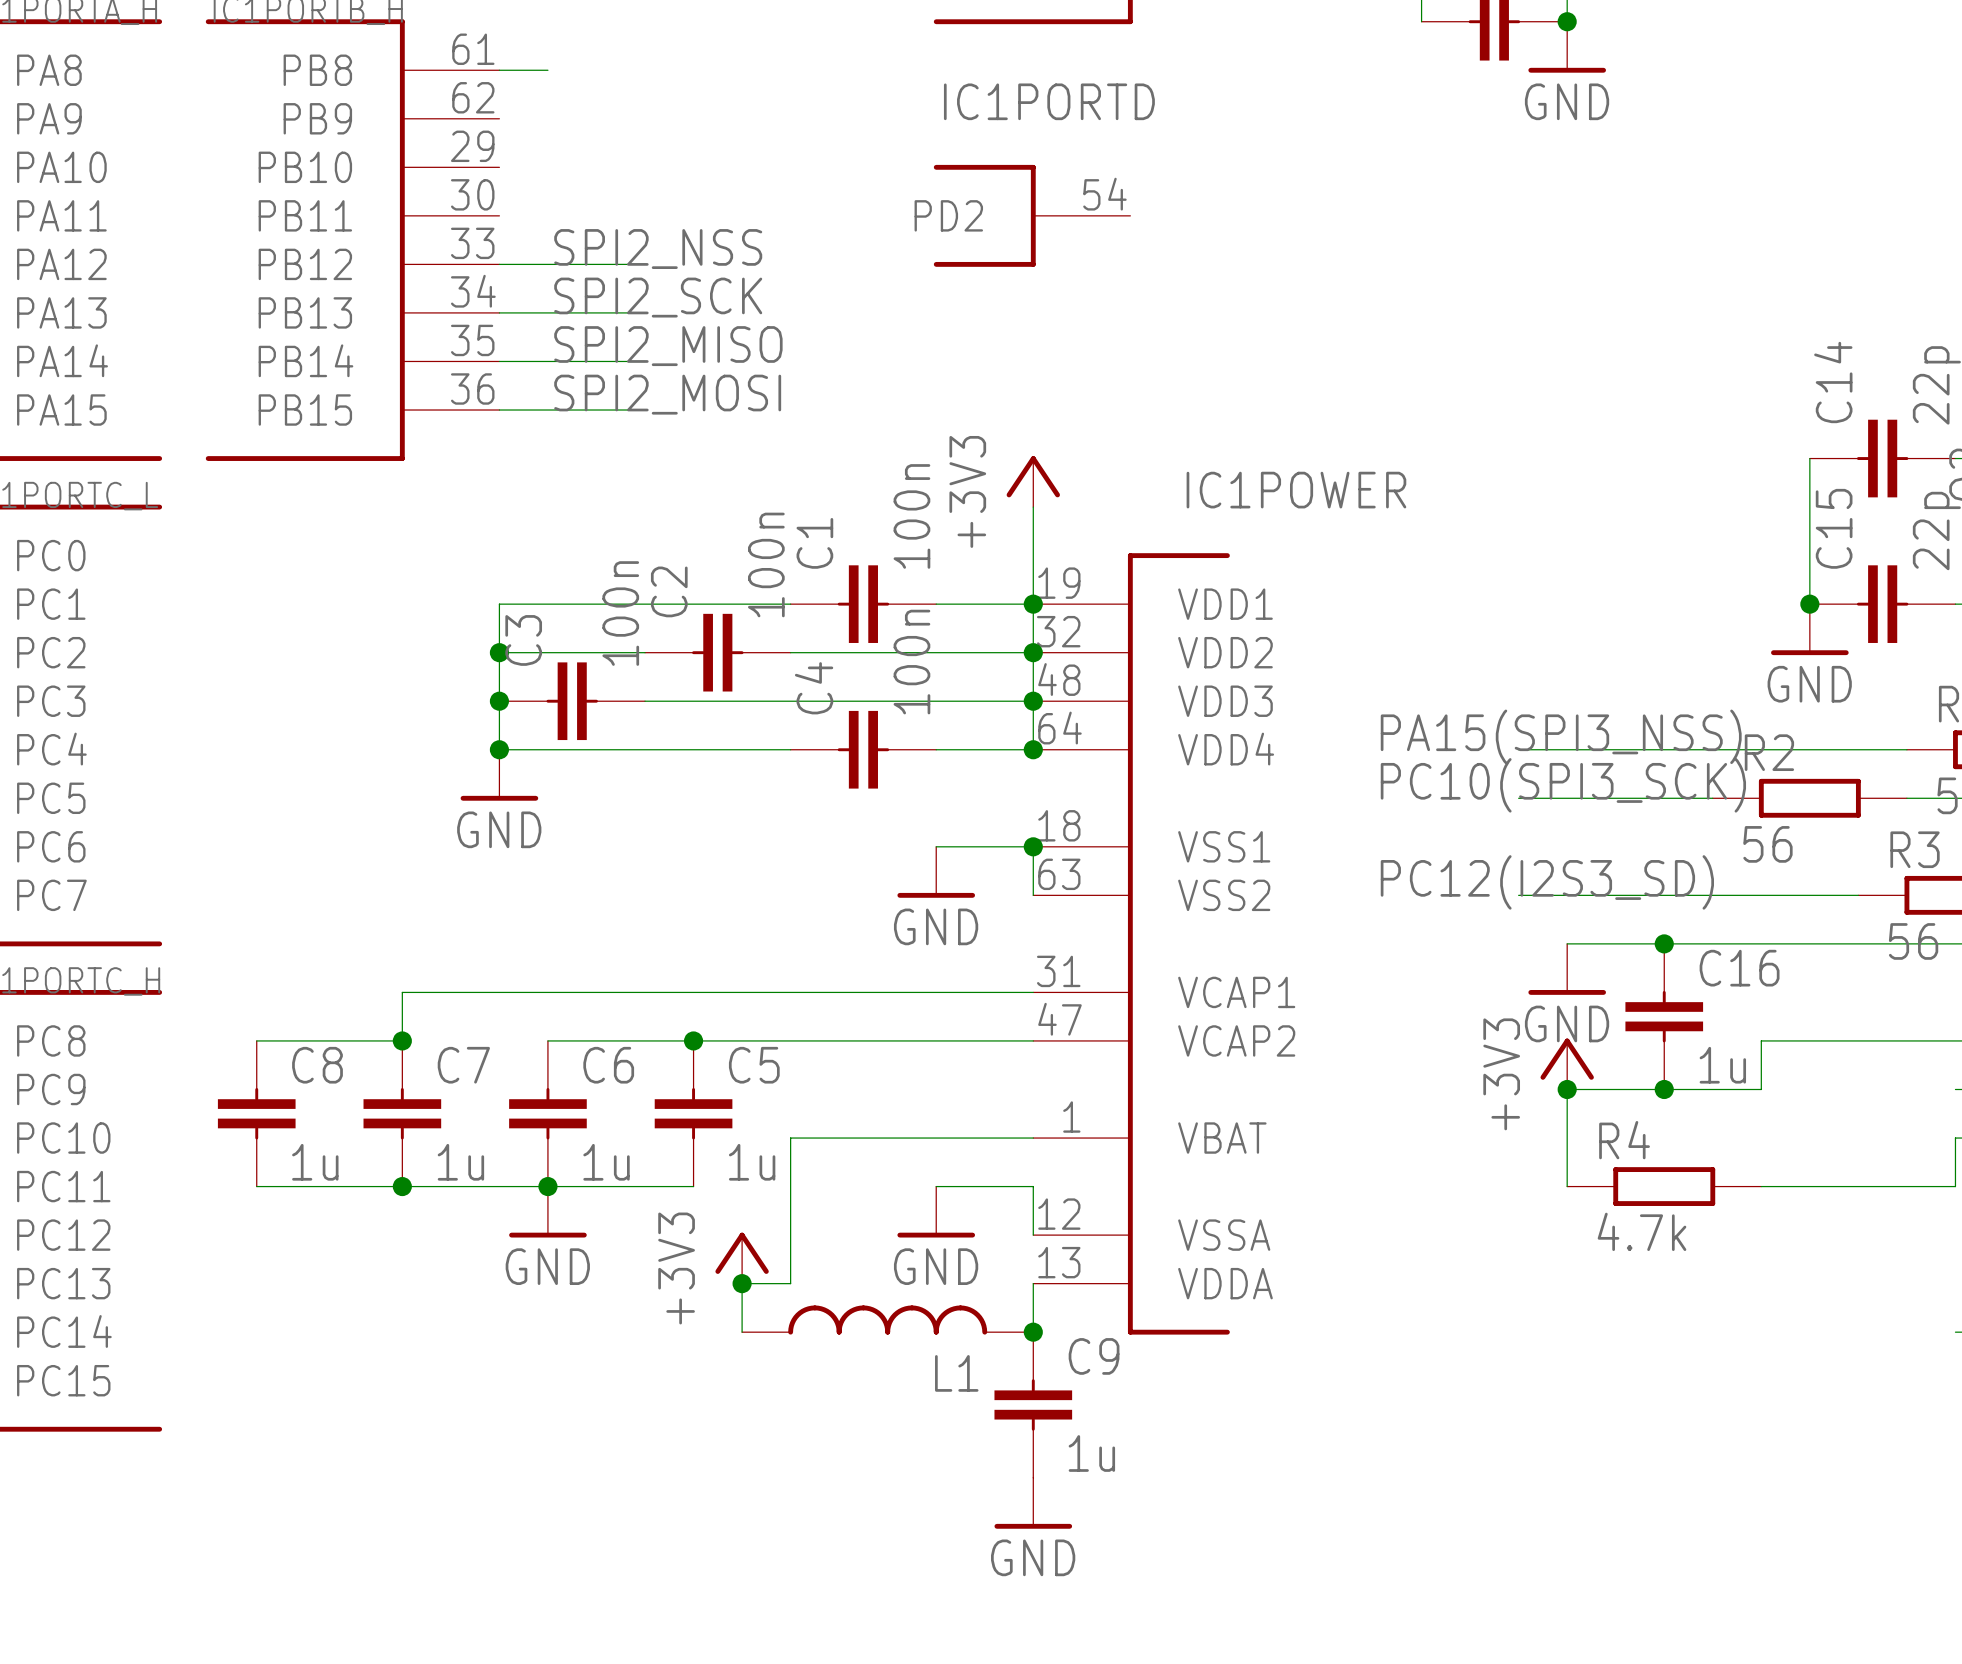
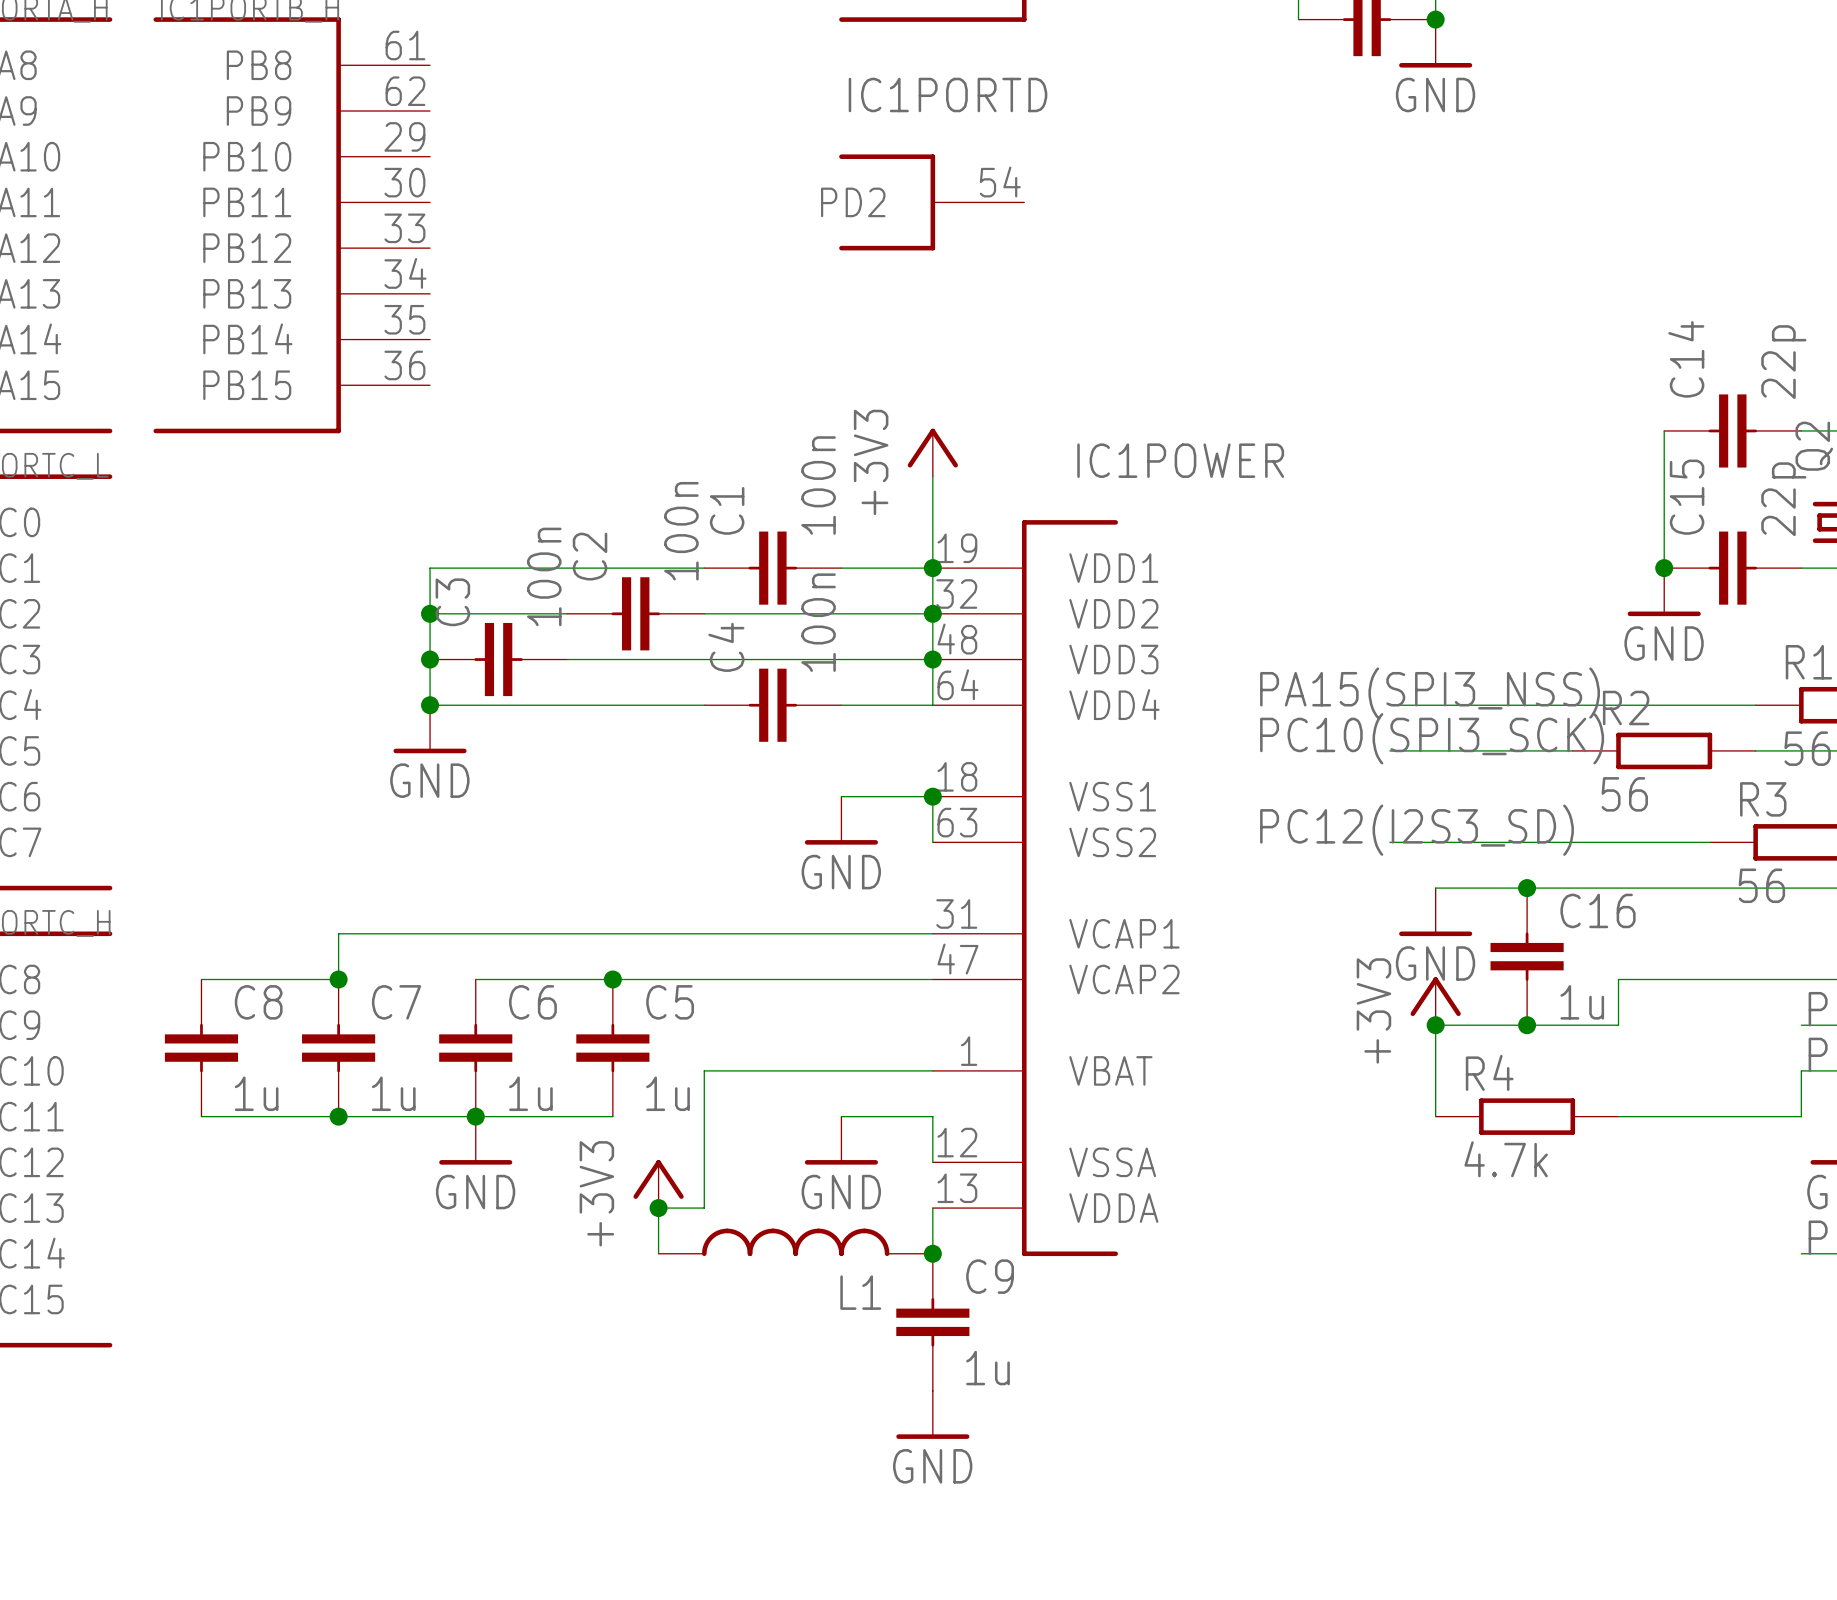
wire: (499, 70) (547, 70) -> none
label: SPI2_NSS (658, 249) -> none
wire: (499, 264) (645, 264) -> none
label: SPI2_SCK (658, 297) -> none
wire: (499, 312) (645, 312) -> none
label: SPI2_MISO (668, 346) -> none
wire: (499, 361) (645, 361) -> none
label: SPI2_MOSI (667, 394) -> none
wire: (499, 410) (645, 410) -> none
junction: (1033, 749) -> none

